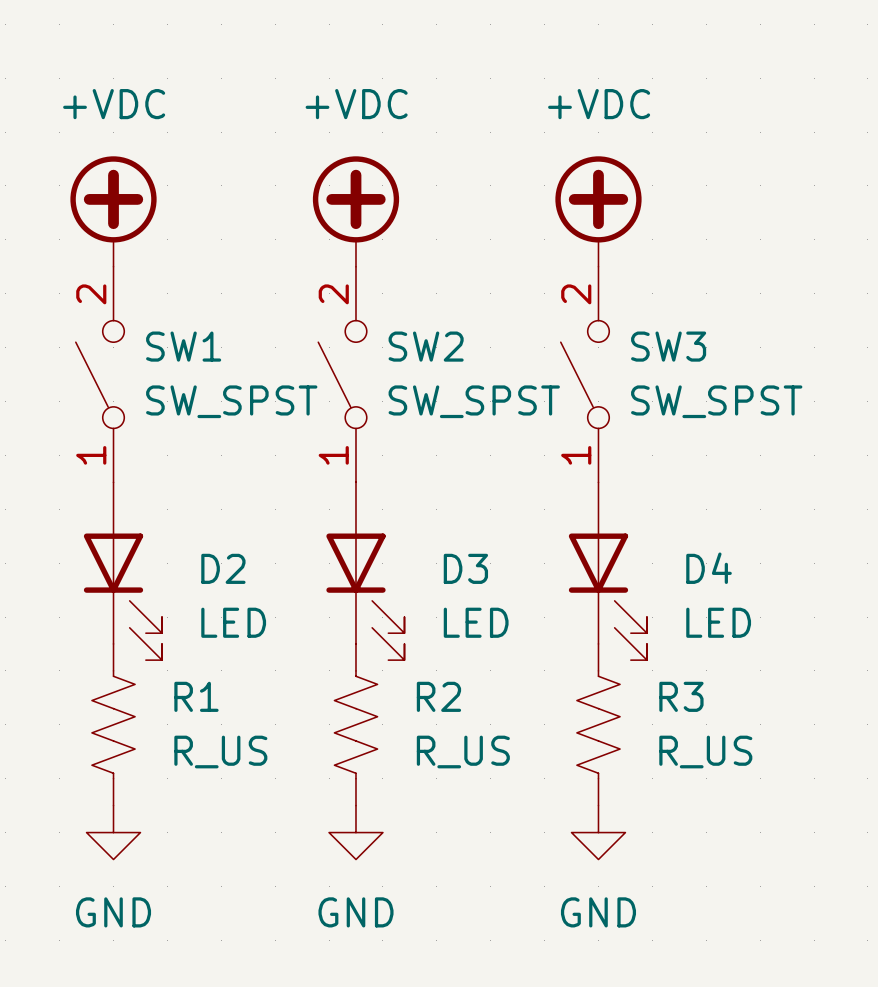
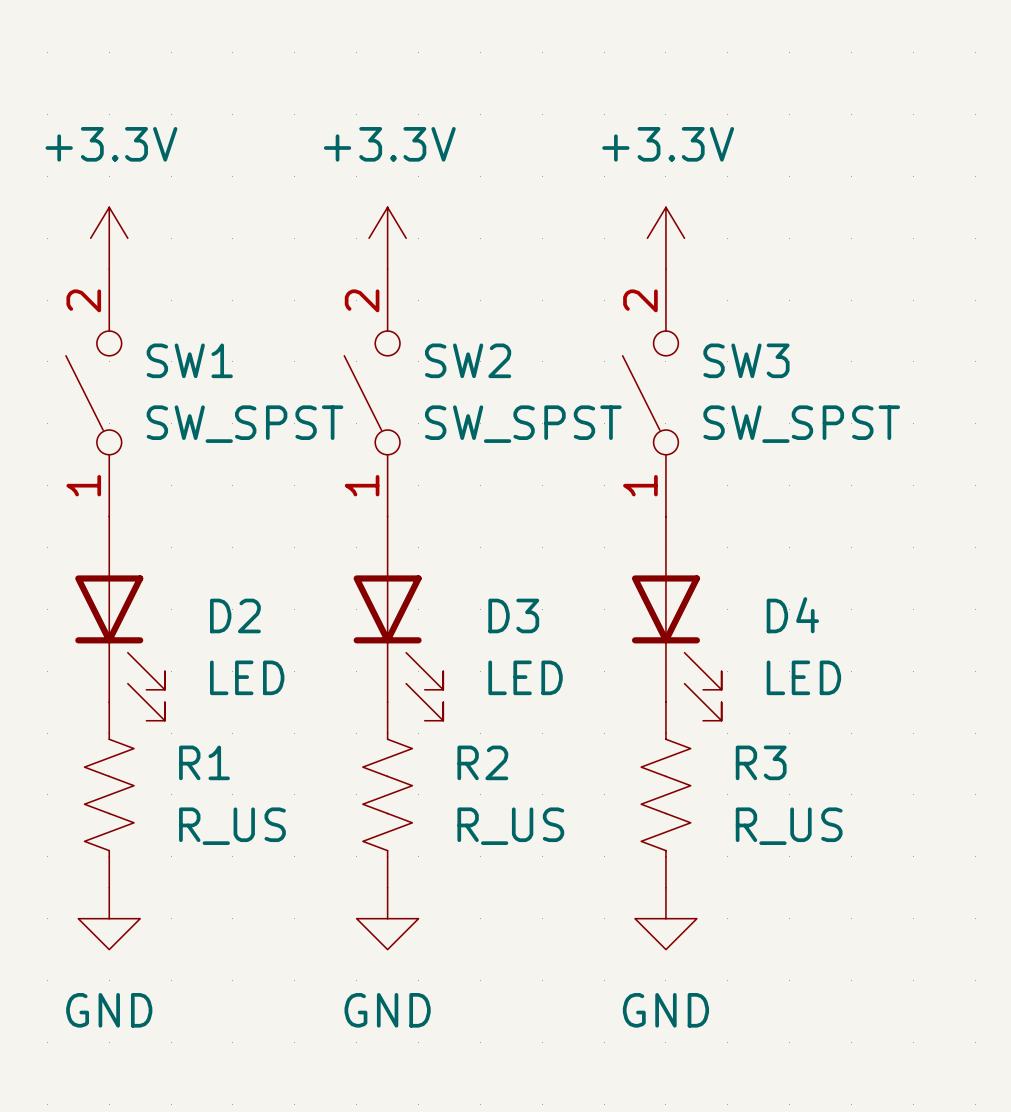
power symbol: +VDC (113, 211) -> none
power symbol: +VDC (355, 211) -> none
power symbol: +VDC (598, 211) -> none
power symbol: none -> +3.3V (109, 238)
power symbol: none -> +3.3V (387, 238)
power symbol: none -> +3.3V (665, 238)

